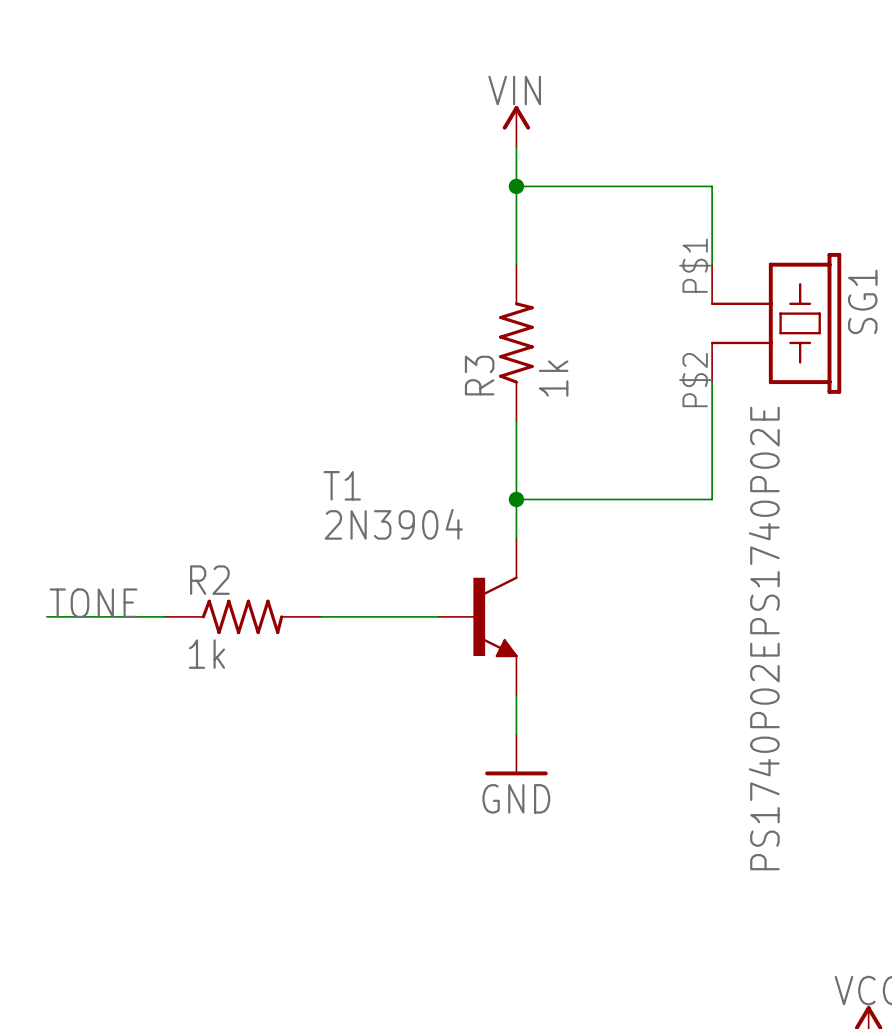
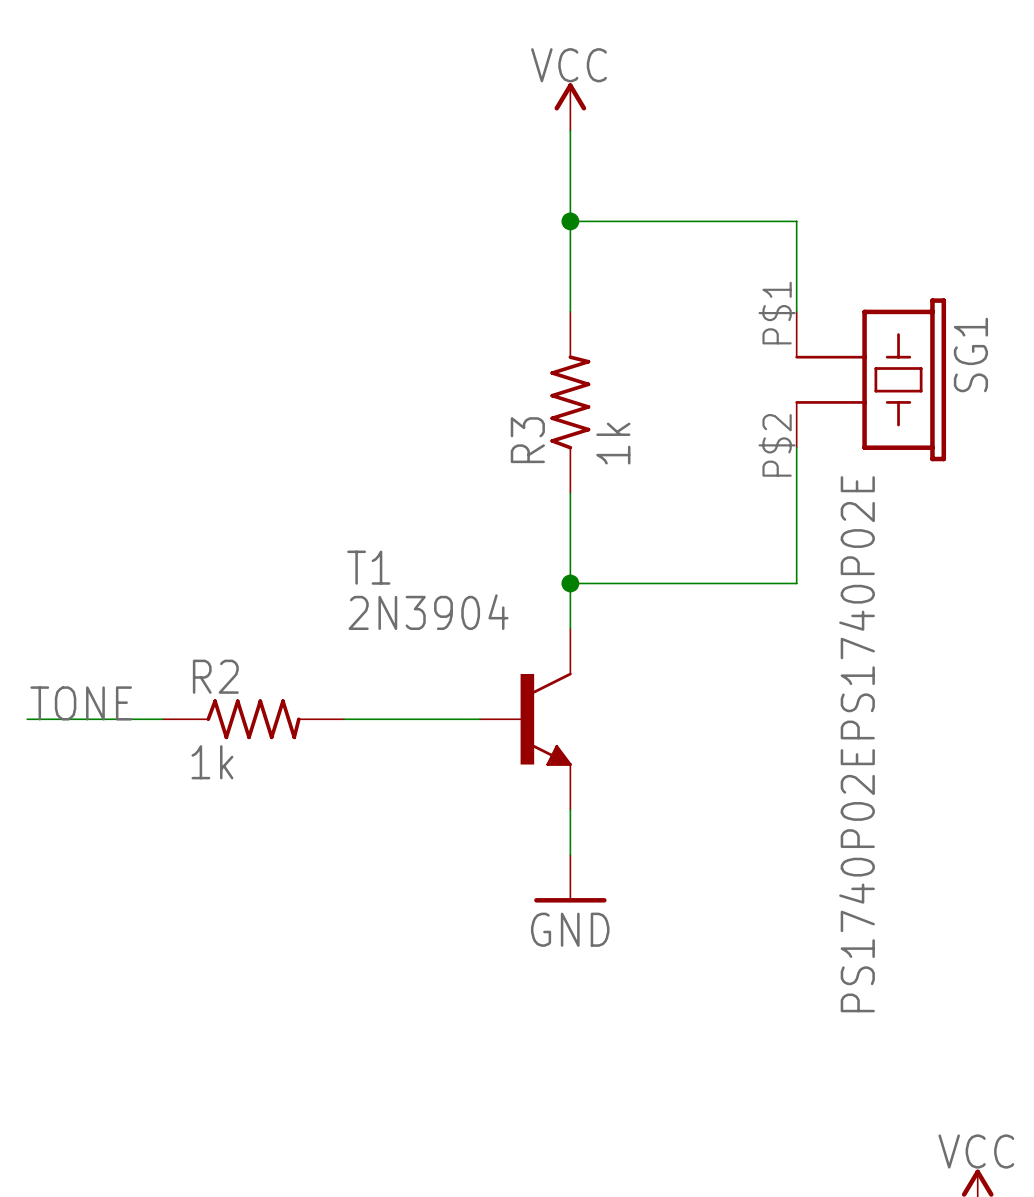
power symbol: none -> VCC (570, 107)
power symbol: VIN (516, 126) -> none

